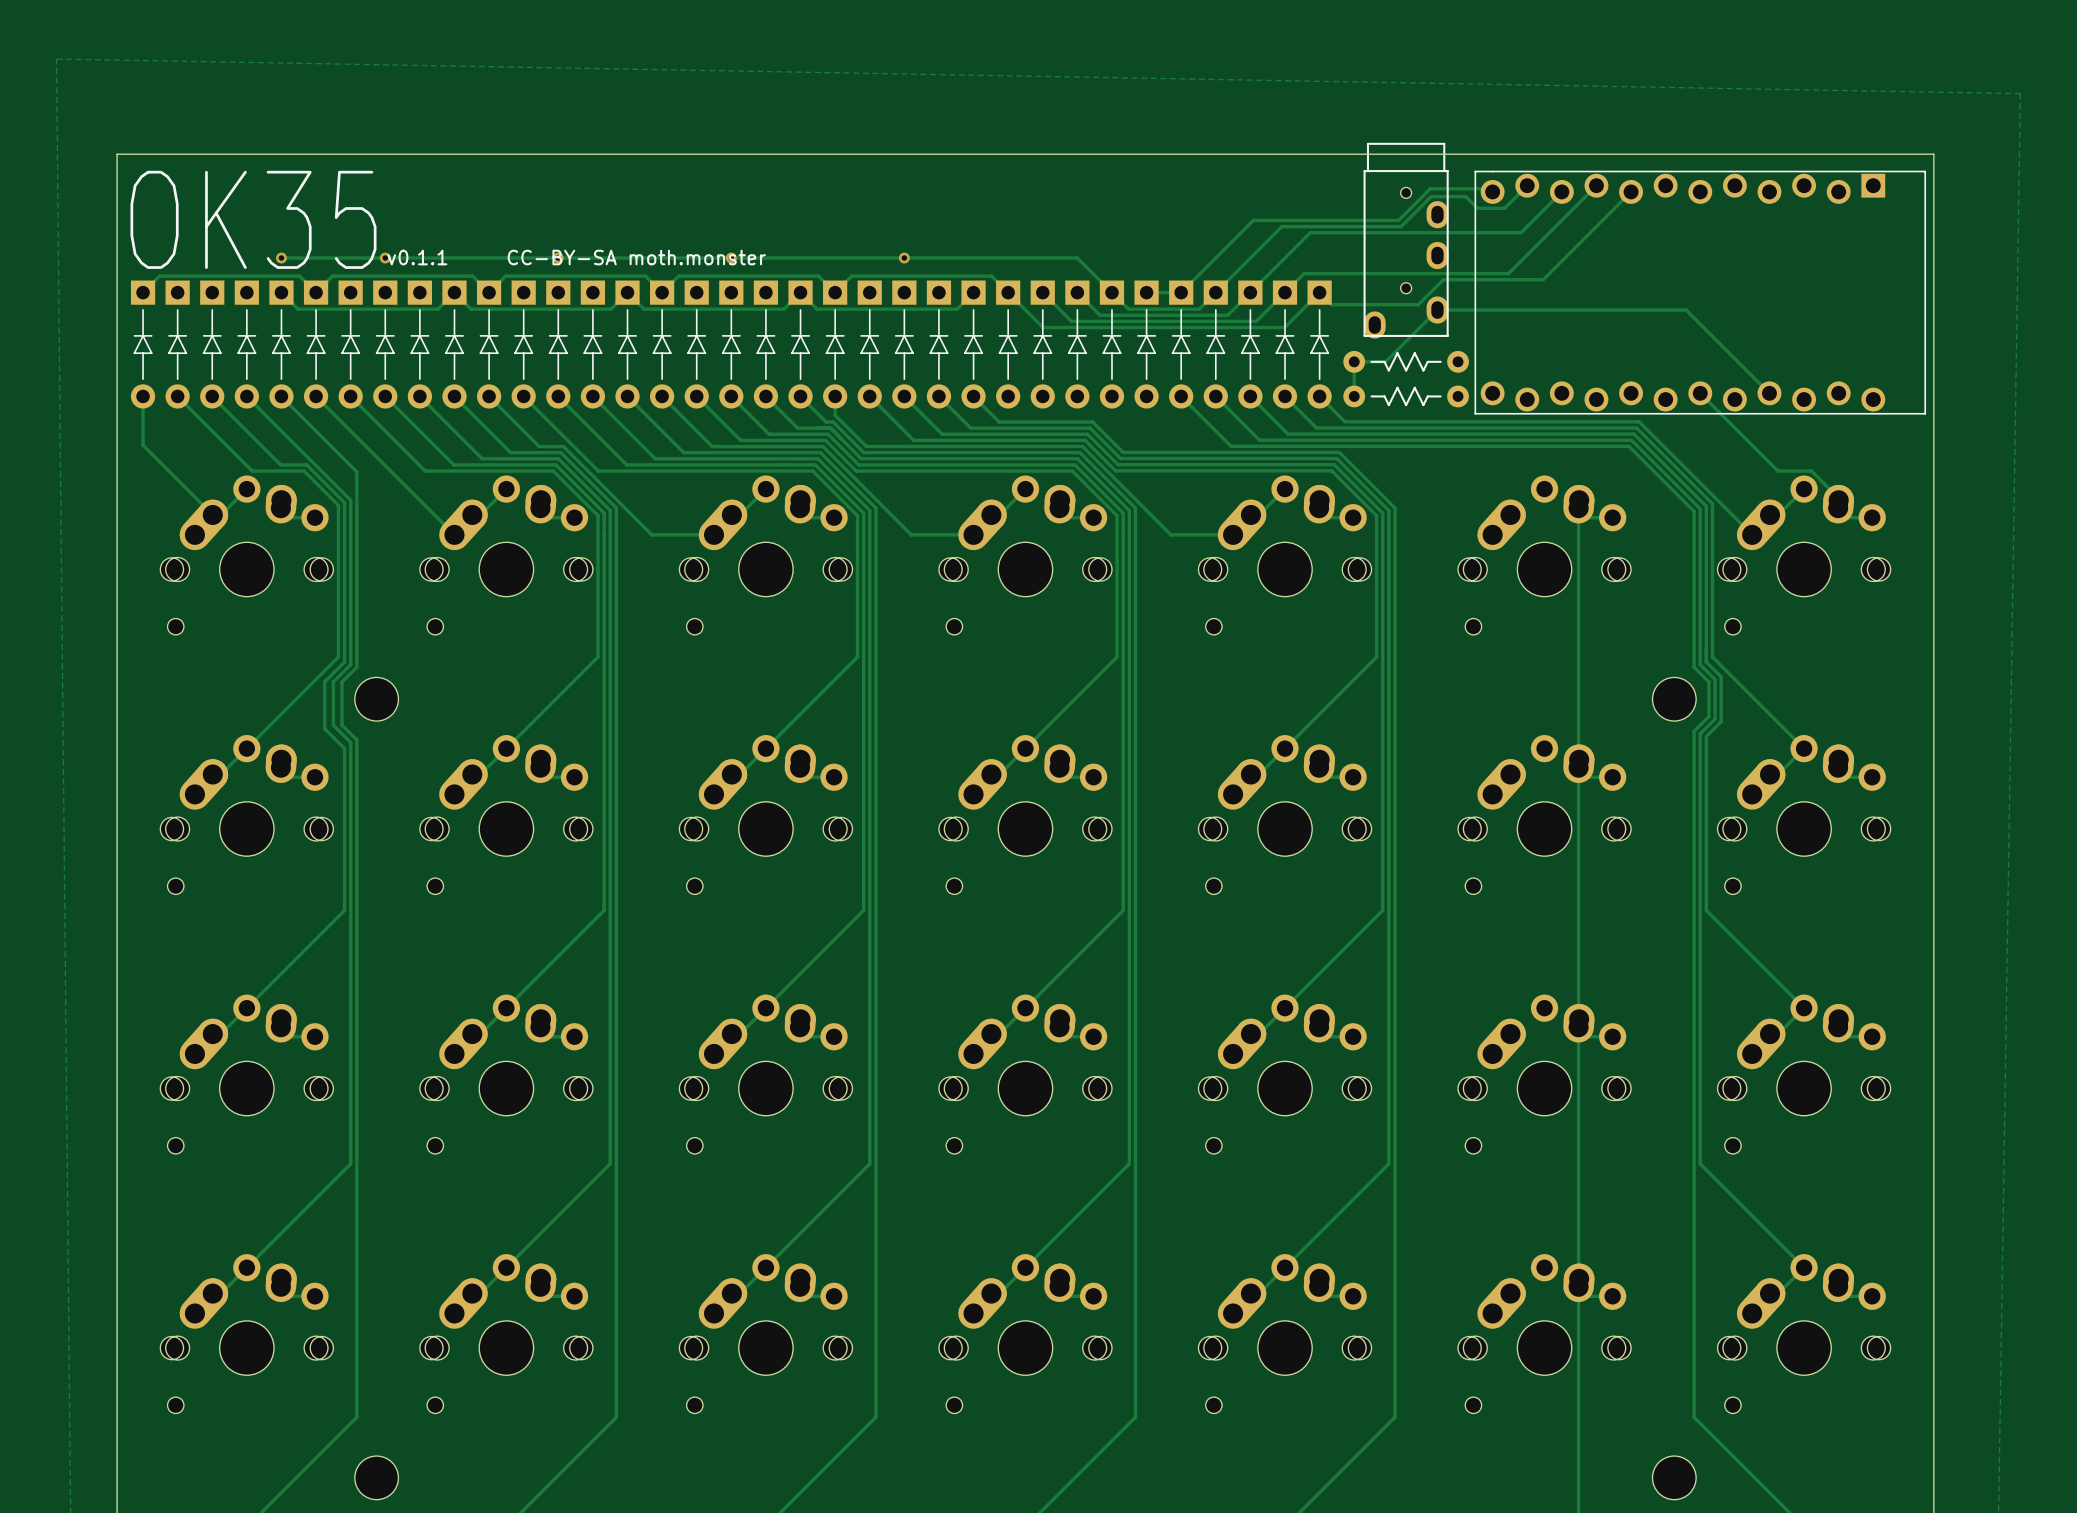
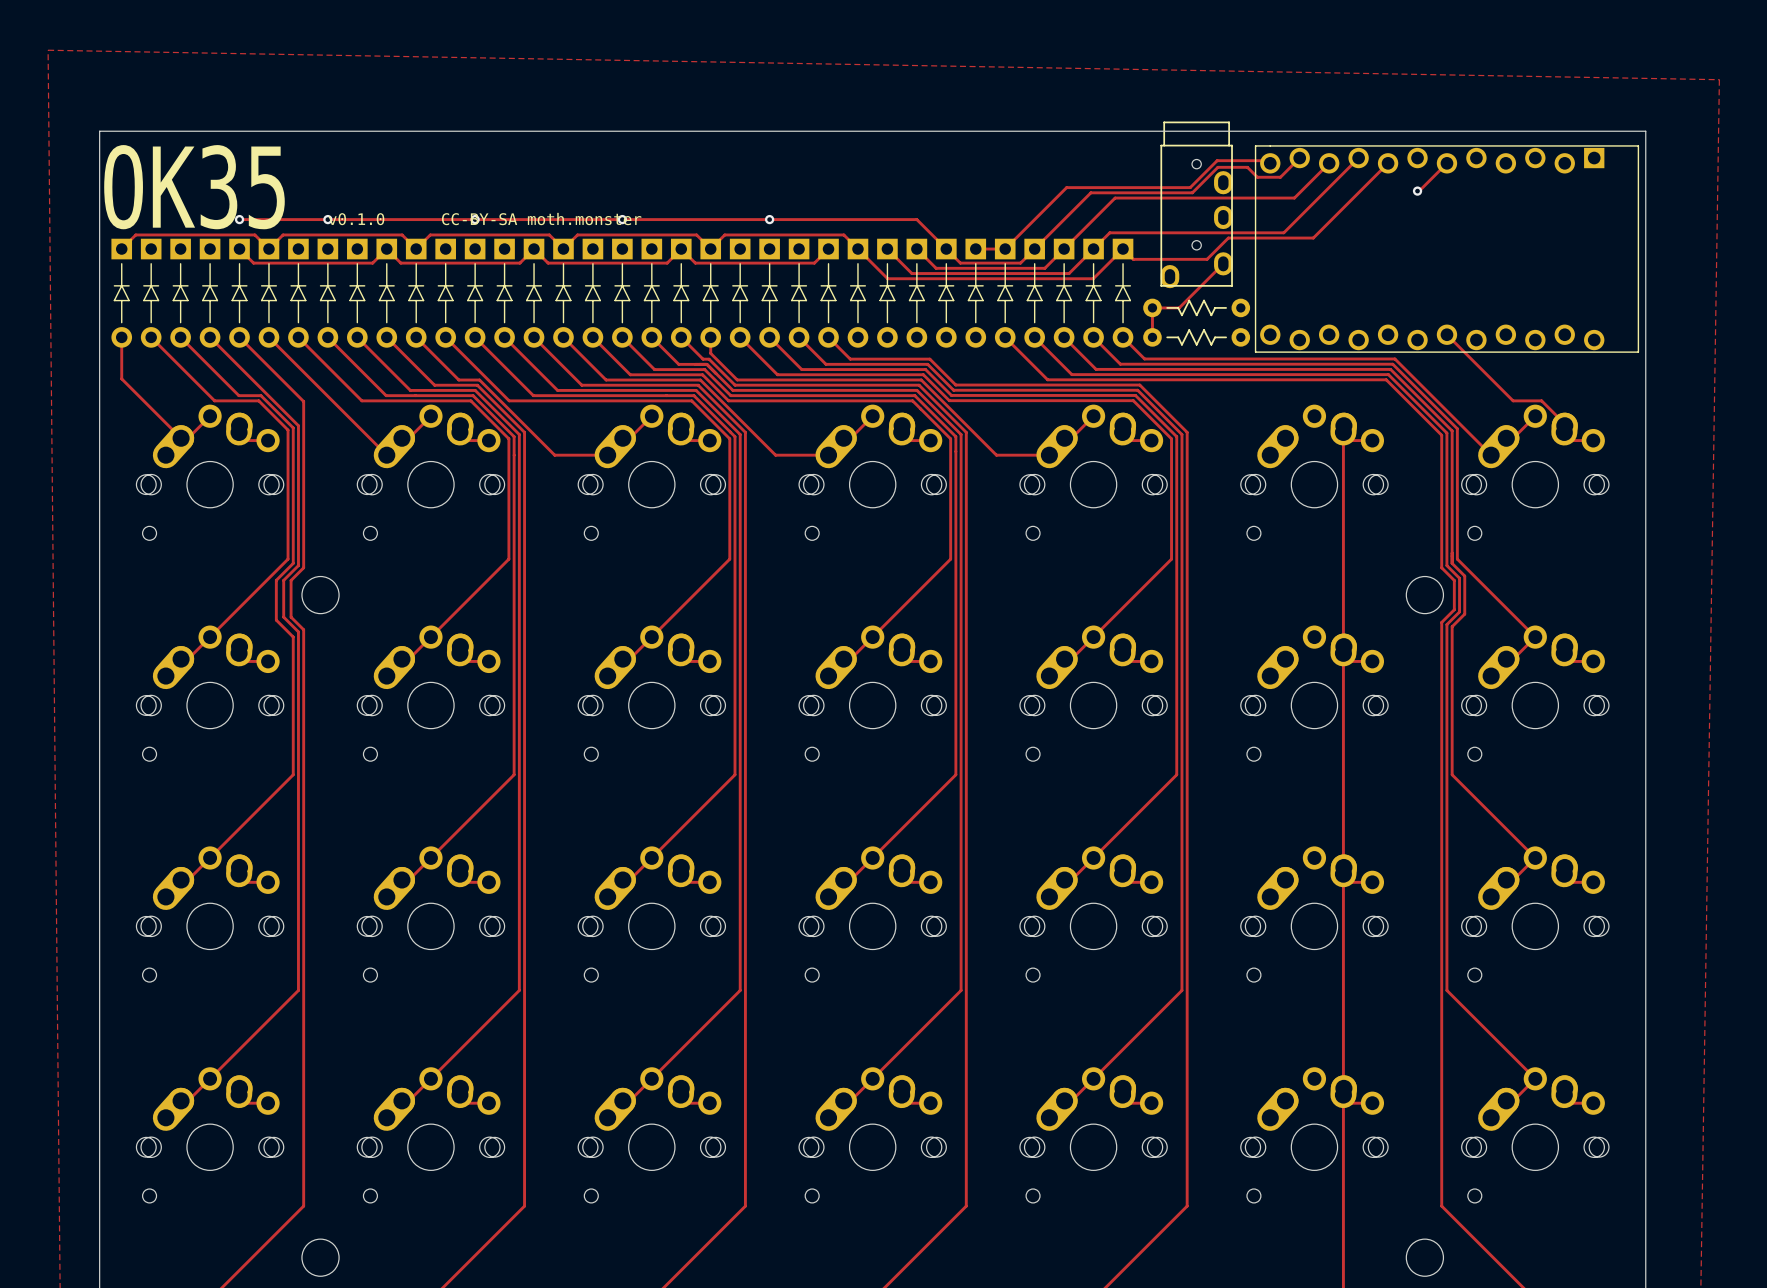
track: none -> (1446, 163) (1417, 191)
via: none -> (1417, 191)
text: v0.1.1 (417, 257) -> v0.1.0 (356, 219)
track: (1437, 310) (1686, 310) (1769, 393) -> none

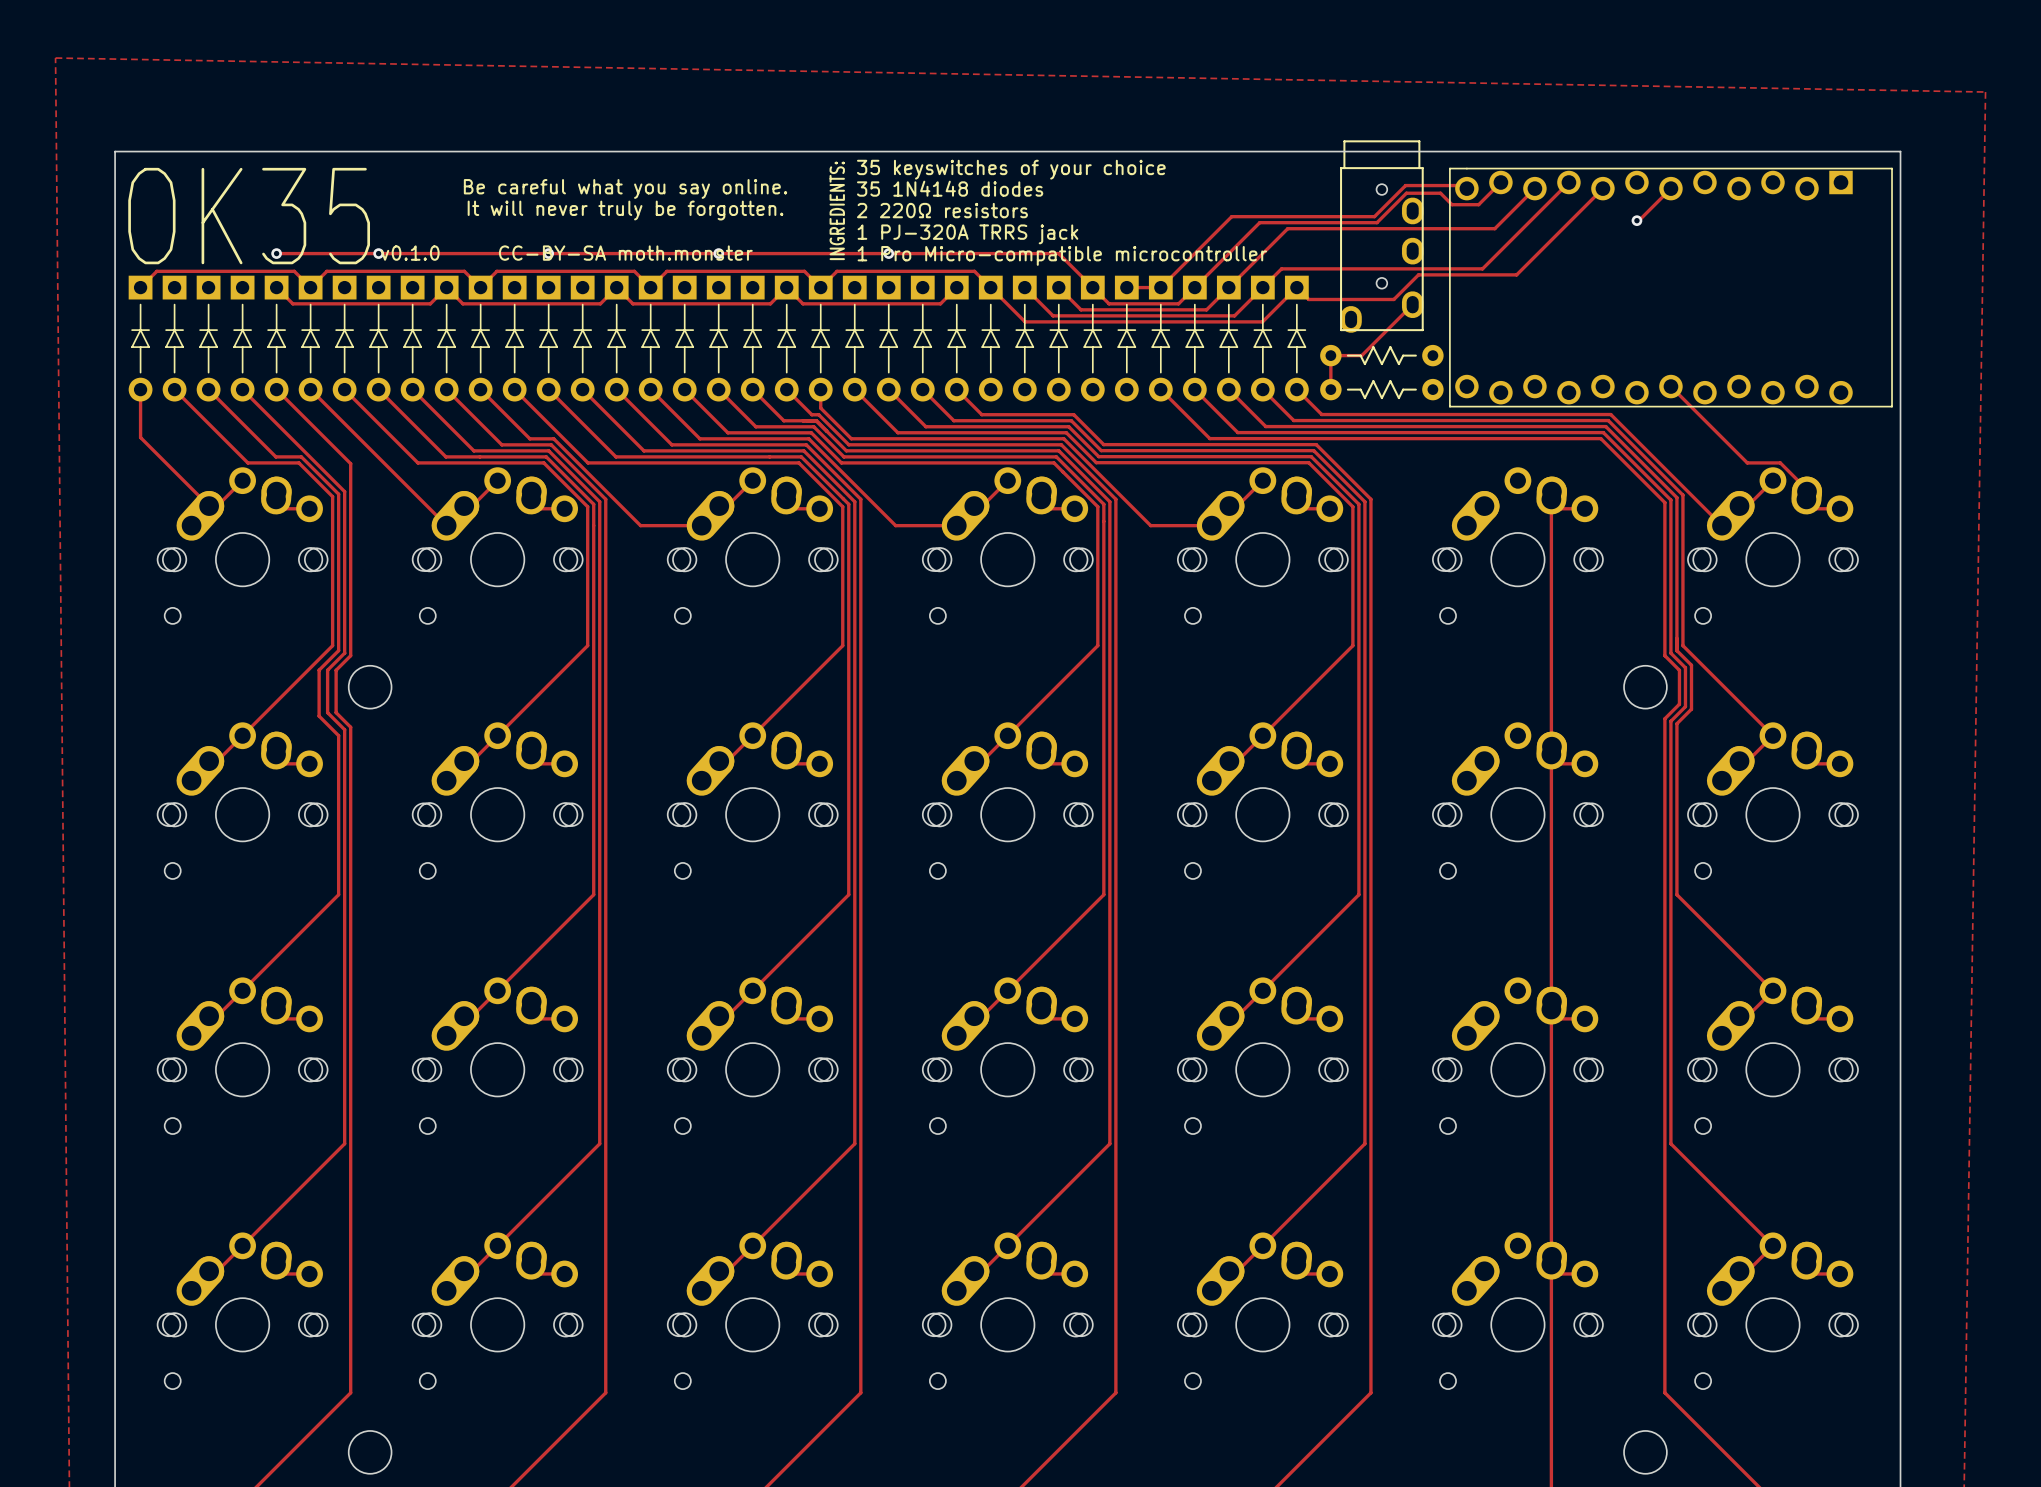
text: none -> 35 keyswitches of your choice (1011, 169)
text: none -> Be careful what you say online. (625, 188)
text: none -> 35 1N4148 diodes (950, 188)
text: none -> It will never truly be forgotten. (625, 210)
text: none -> 2 220Ω resistors (942, 210)
text: none -> INGREDIENTS: (837, 210)
text: none -> 1 PJ-320A TRRS jack (967, 234)
text: none -> 1 Pro Micro-compatible microcontroller (1062, 255)

